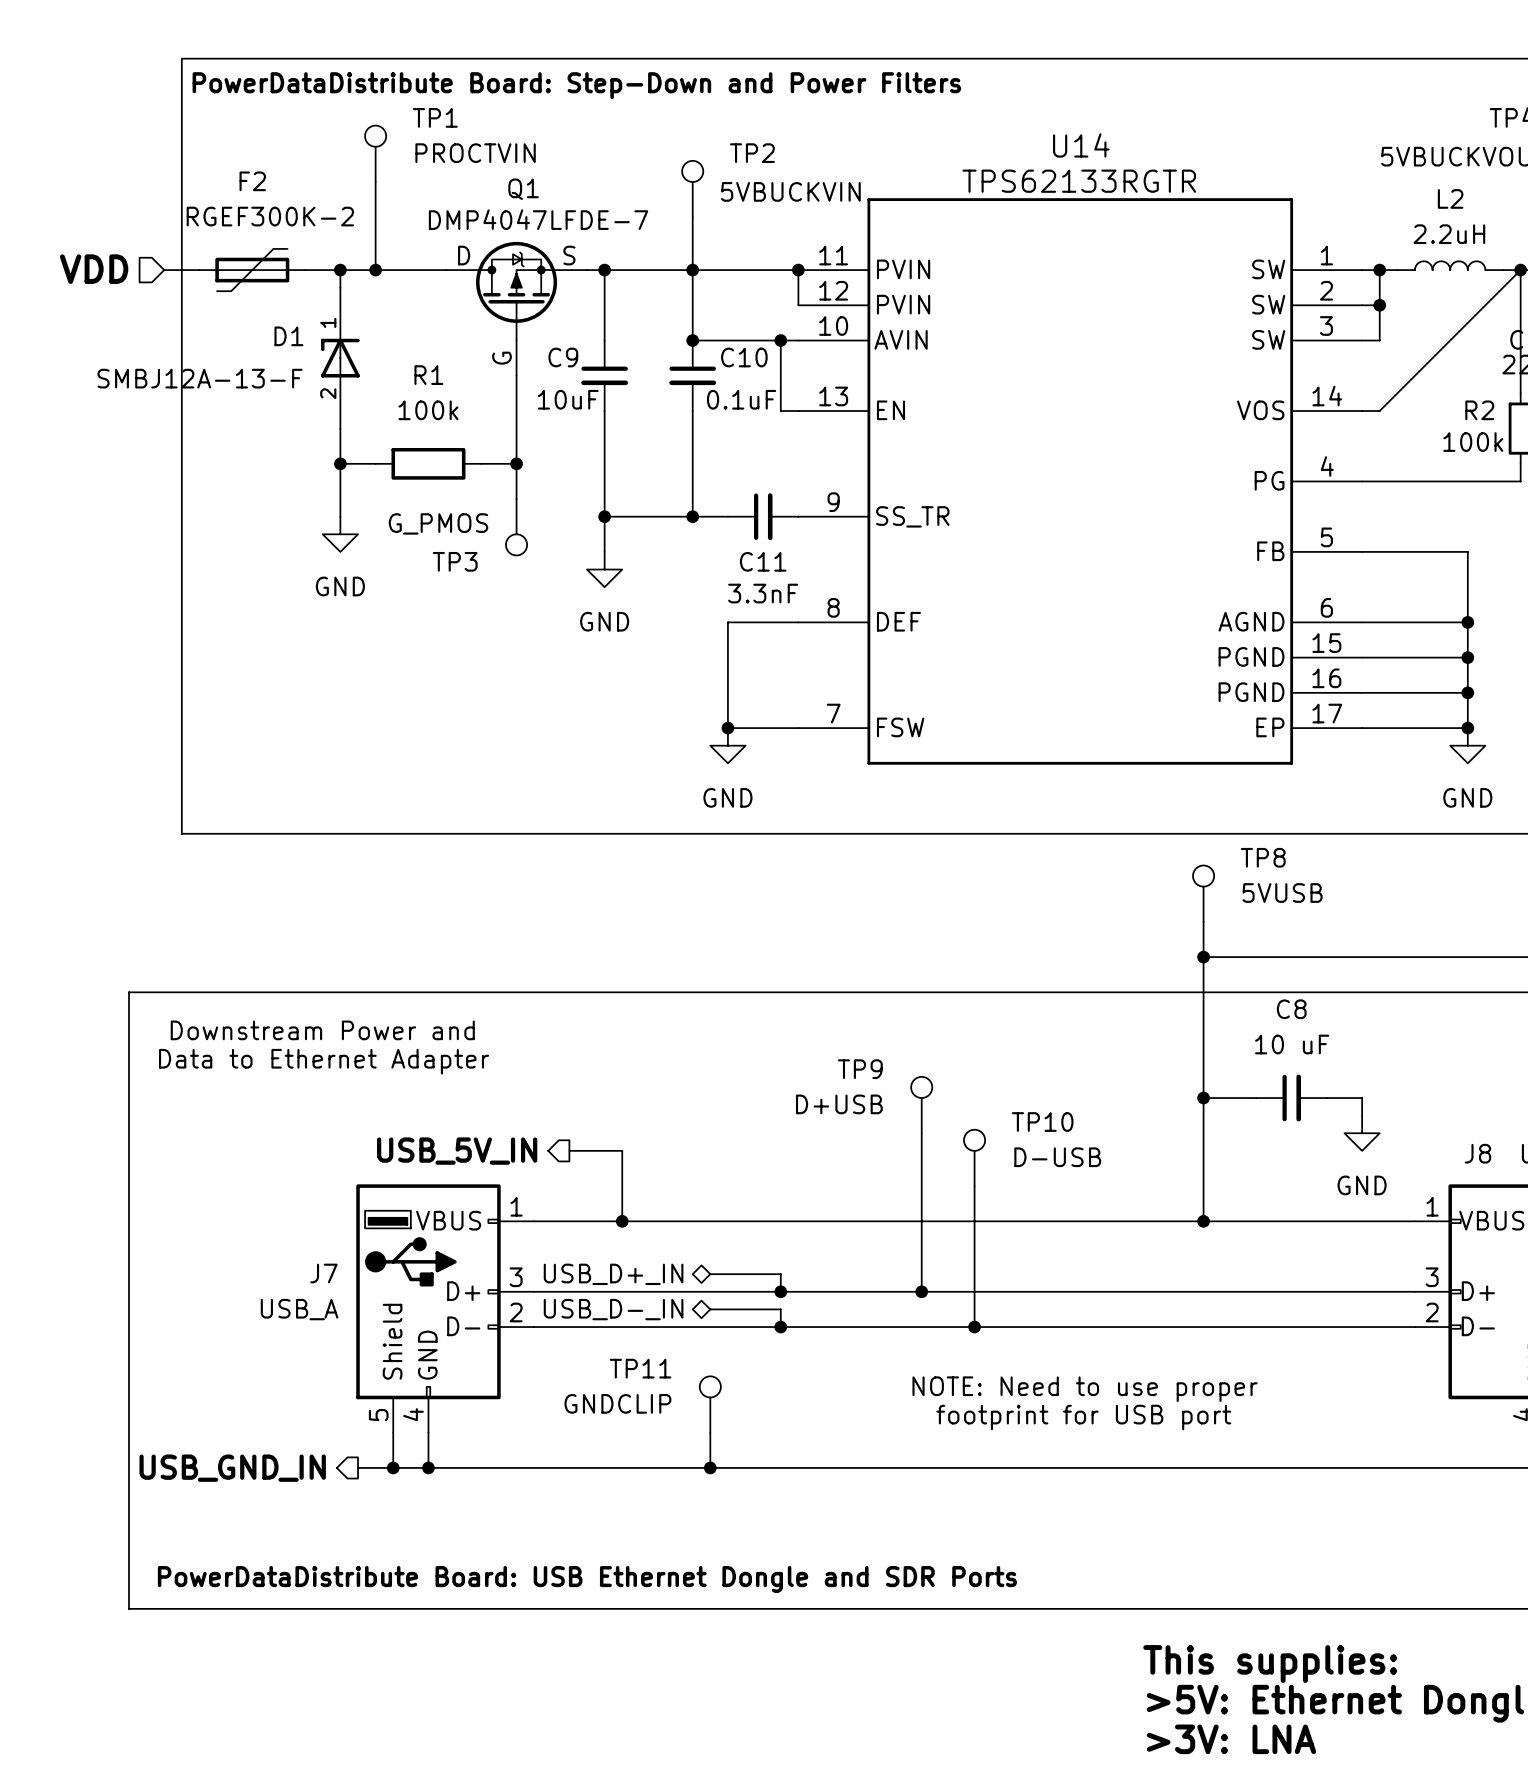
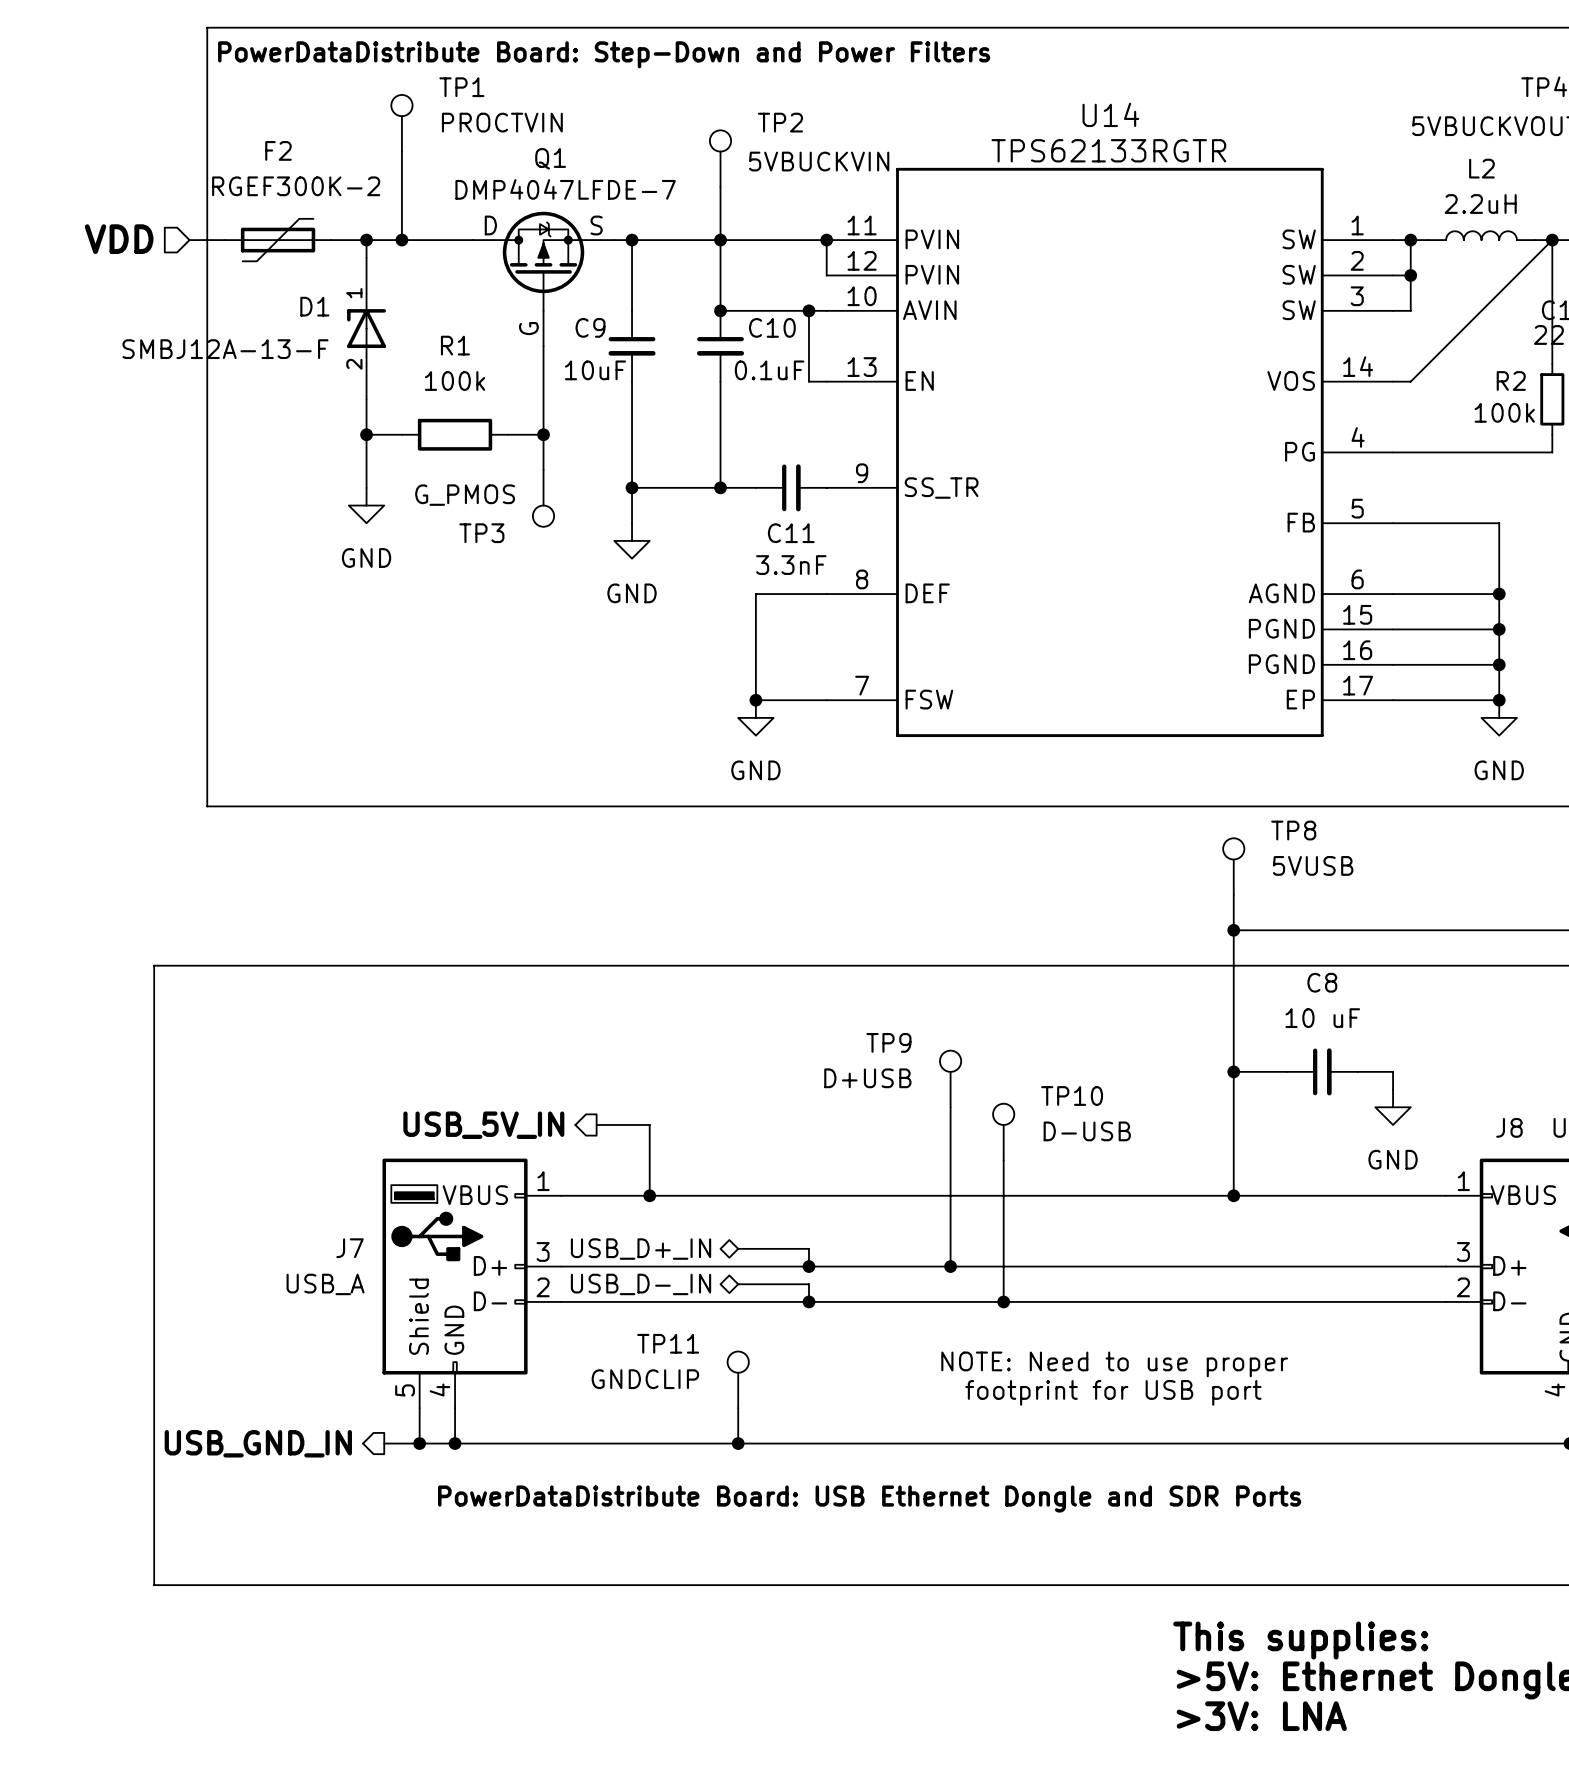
text: Downstream Power and (322, 1030) -> none
text: Data to Ethernet Adapter (324, 1061) -> none
text position: PowerDataDistribute Board: USB Ethernet Dongle and SDR Ports (587, 1579) -> PowerDataDistribute Board: USB Ethernet Dongle and SDR Ports (869, 1498)

